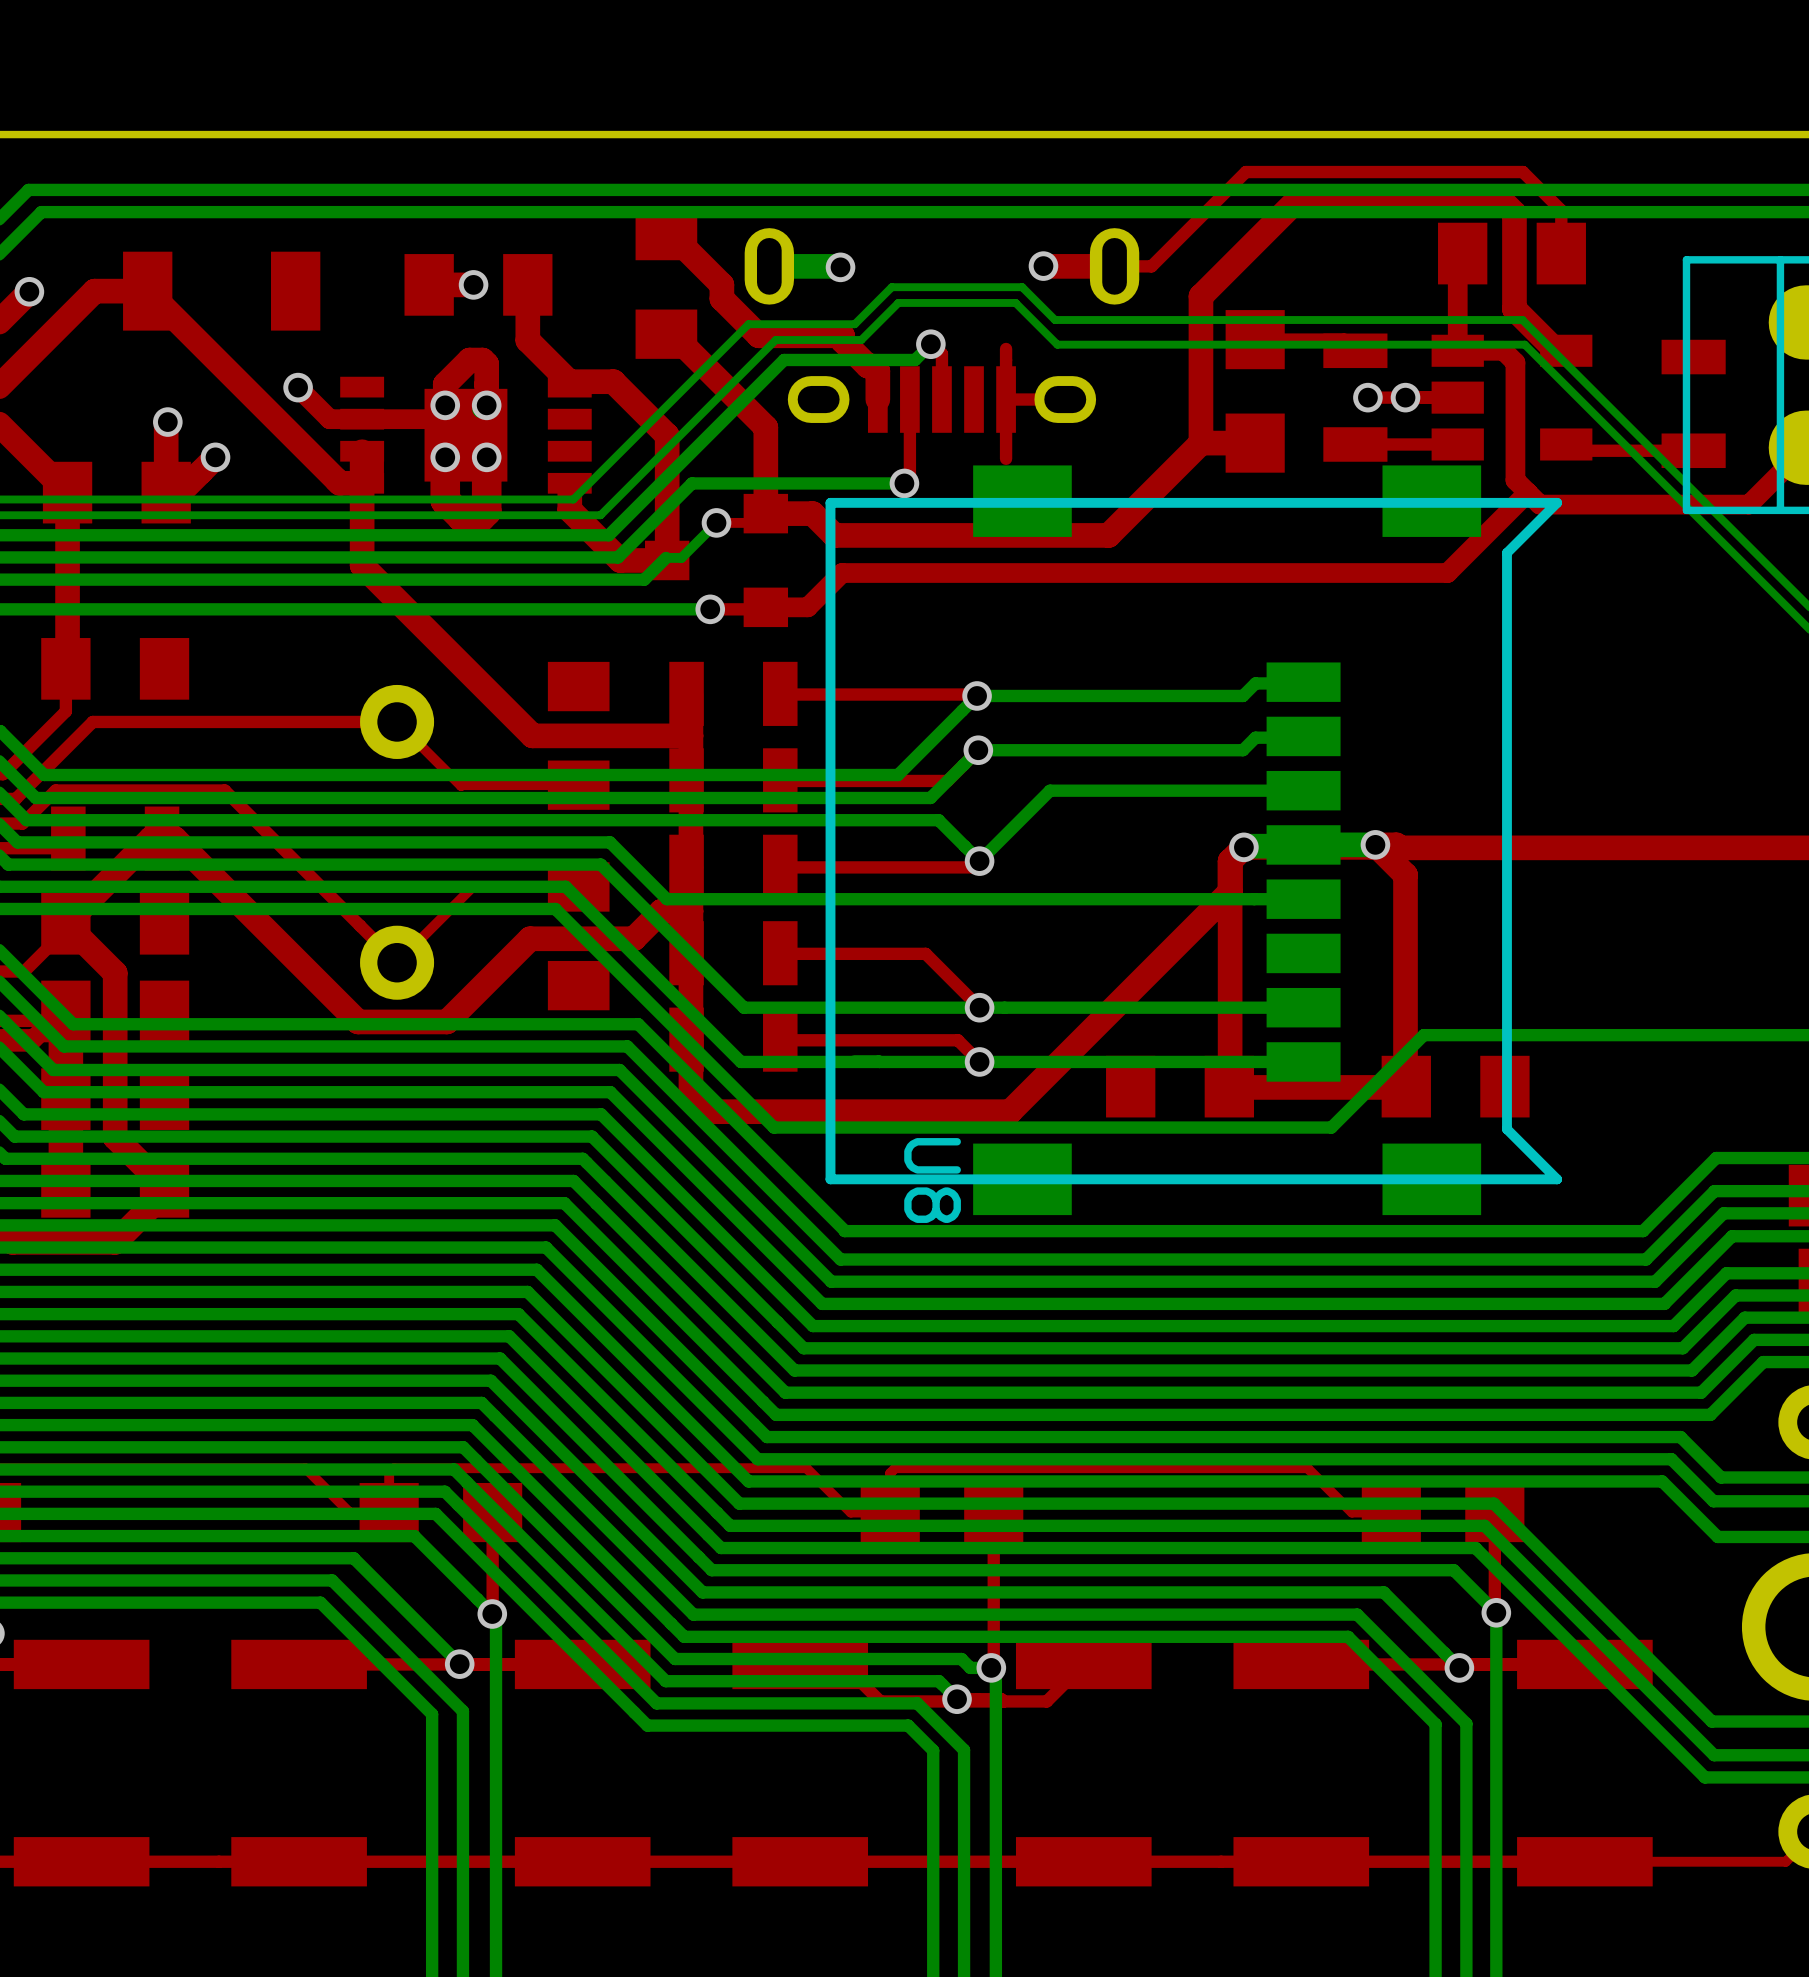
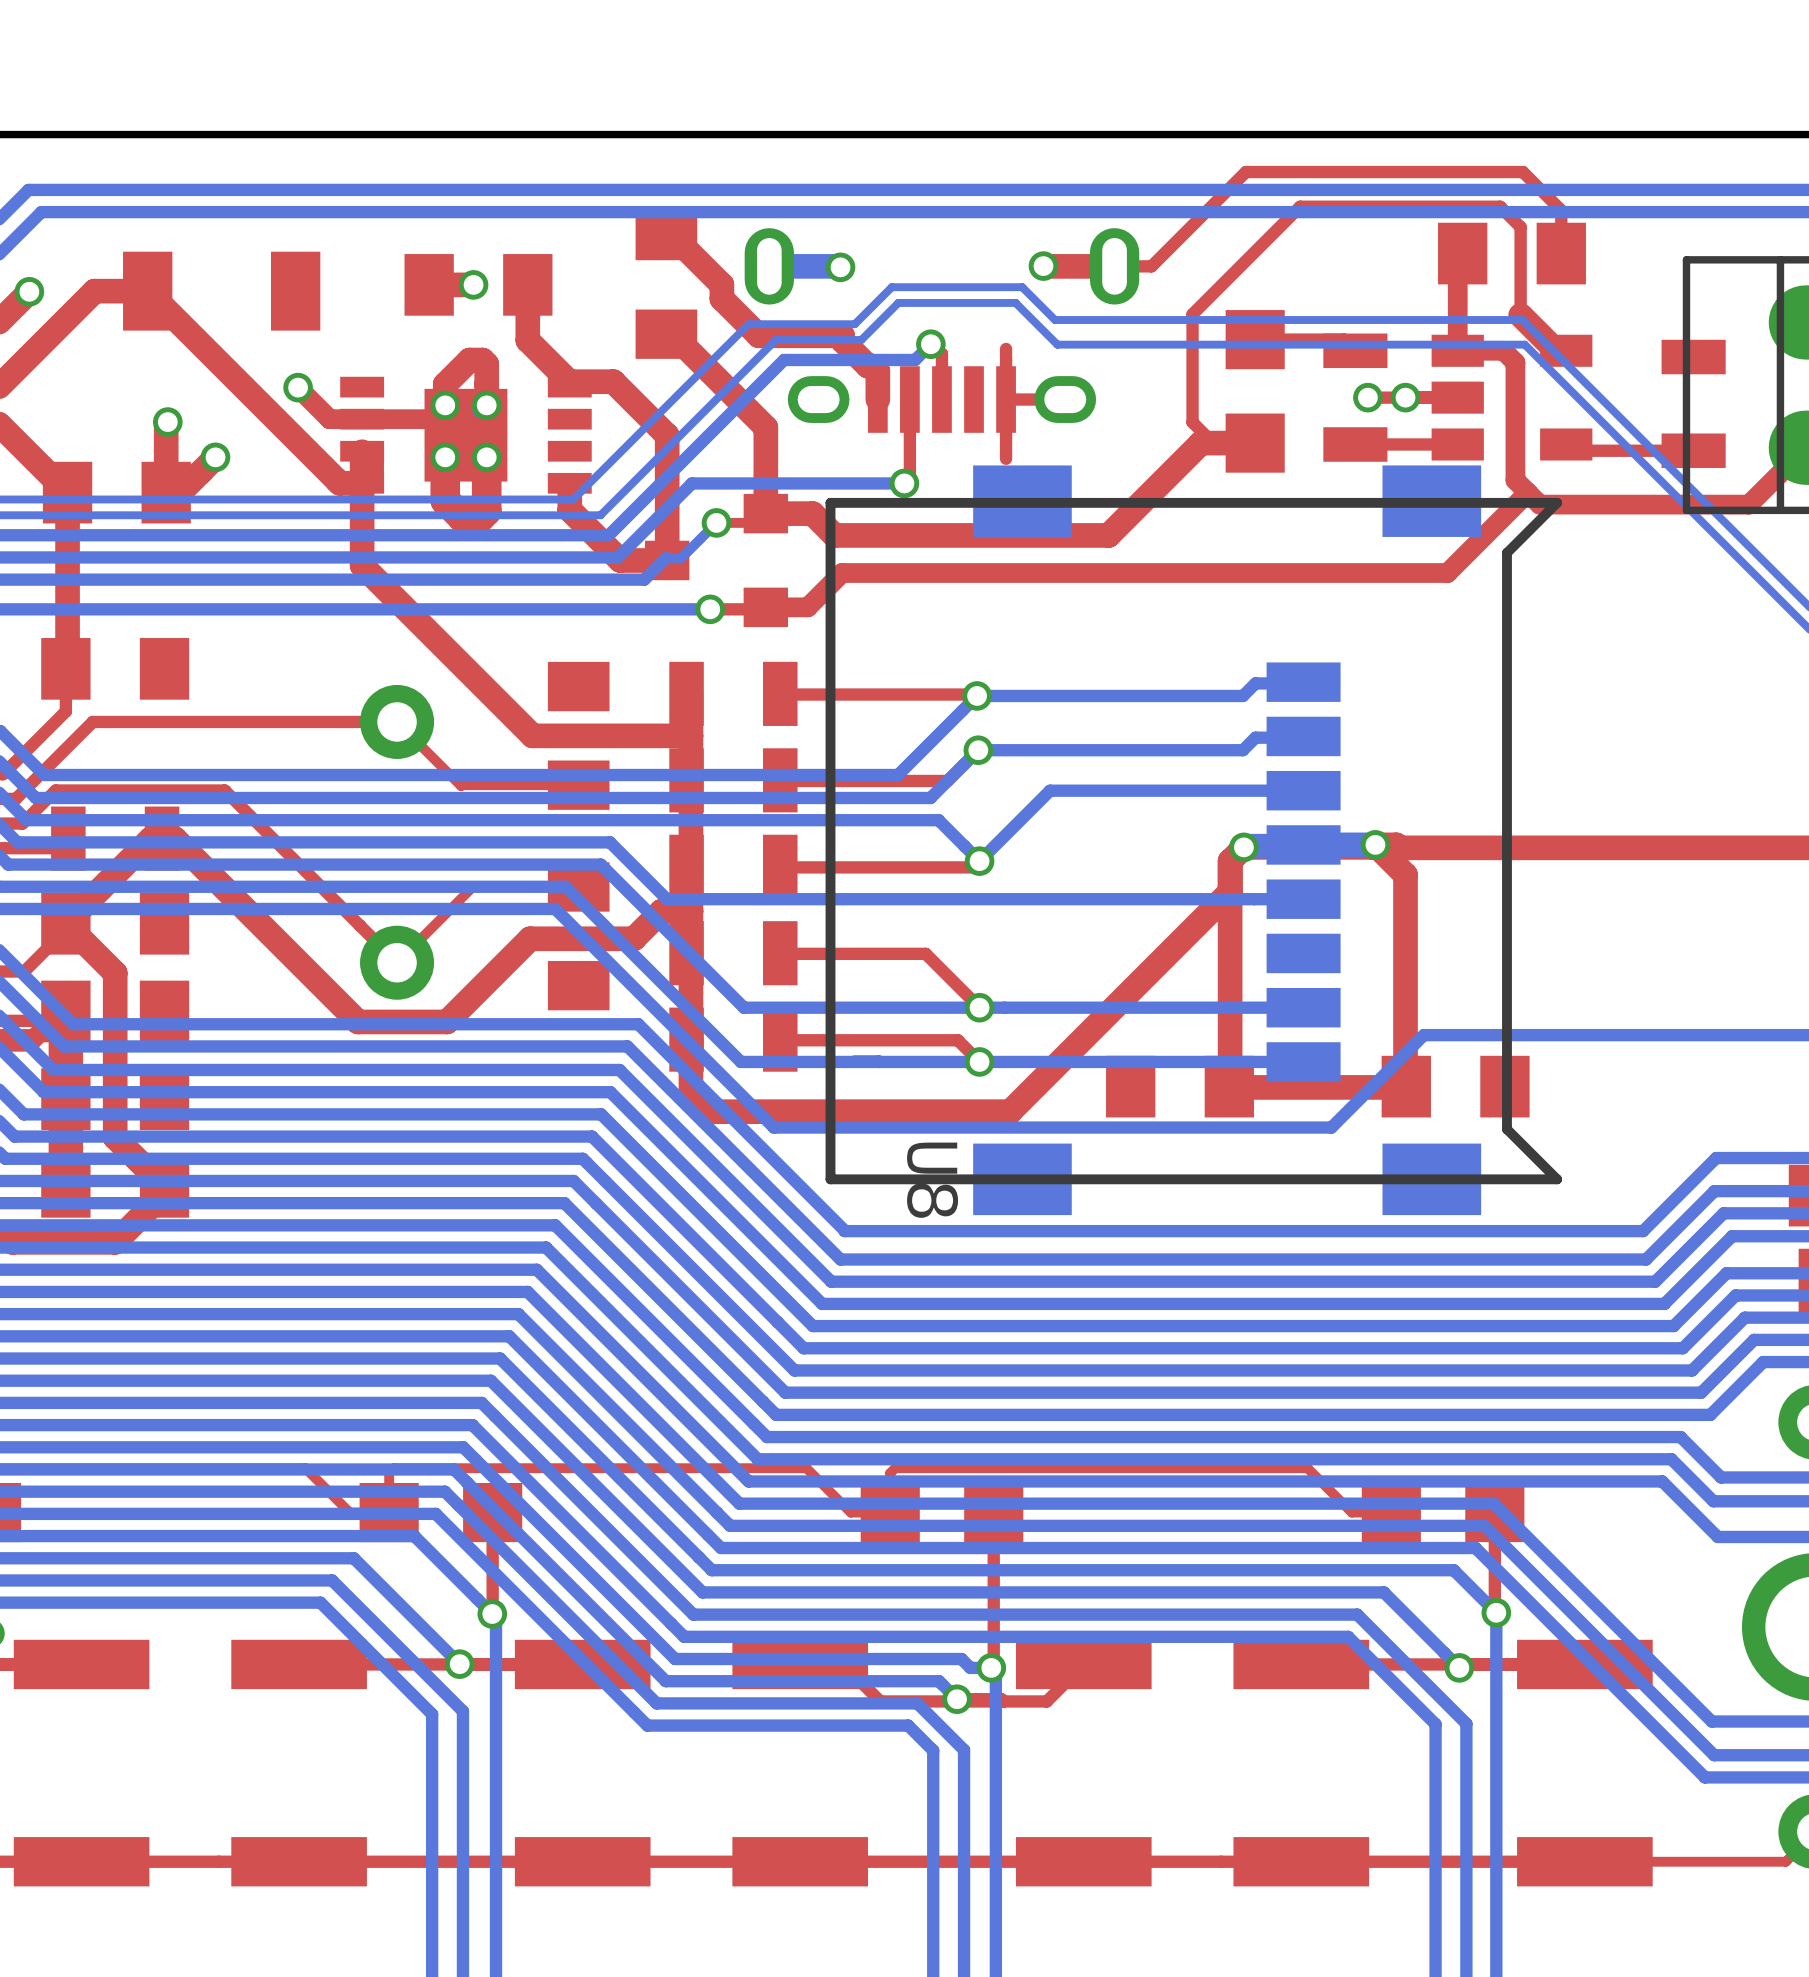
top track: (1520, 315) (1514, 309) (1514, 213) (1501, 200) (1296, 200) (1200, 296) (1200, 443) -> (1520, 315) (1520, 227) (1500, 206) (1300, 206) (1192, 314) (1192, 422) (1213, 443)

